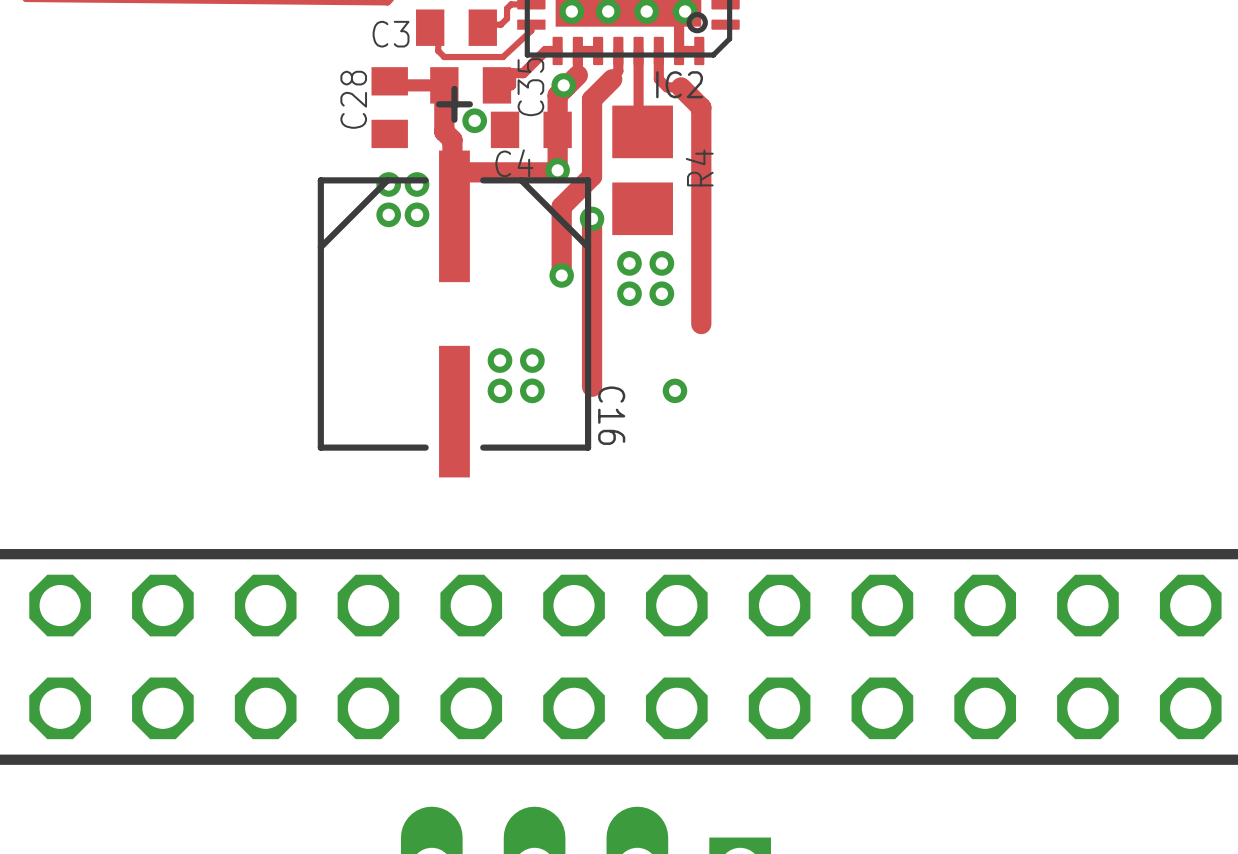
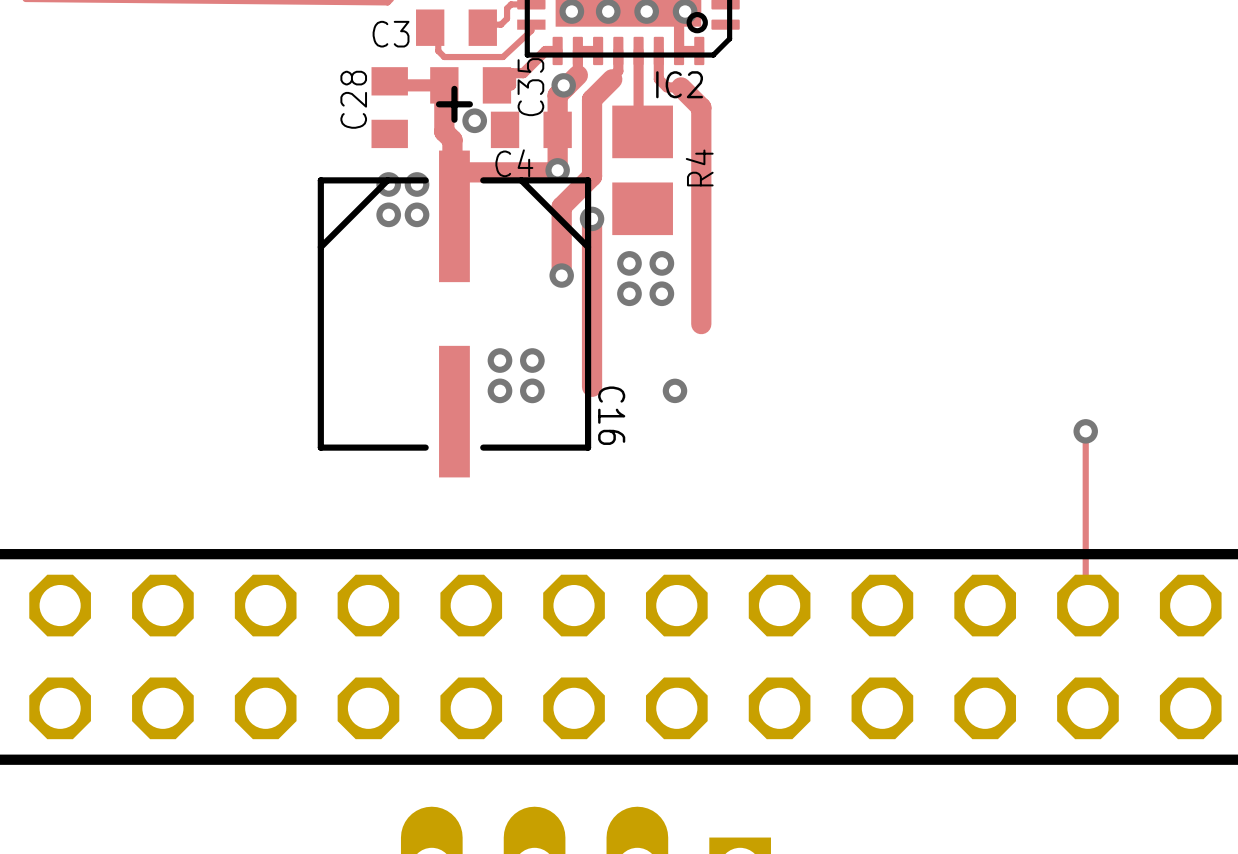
track: none -> (1085, 431) (1085, 603)
via: none -> (1085, 431)

